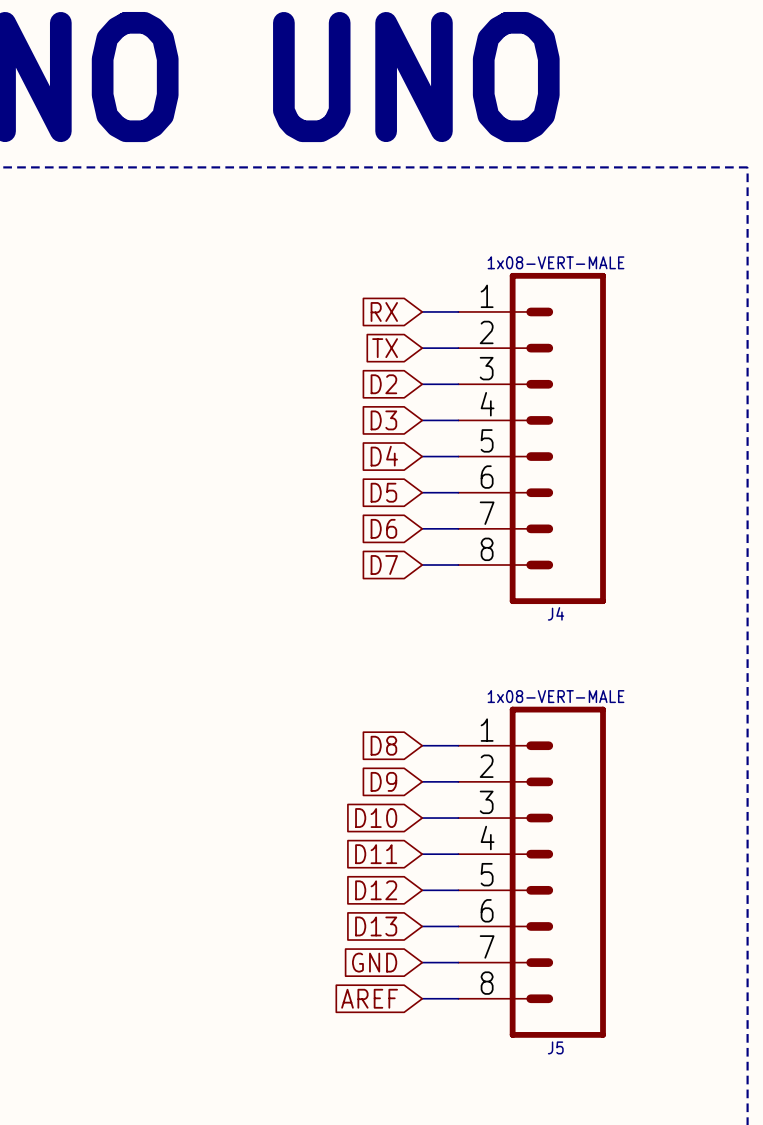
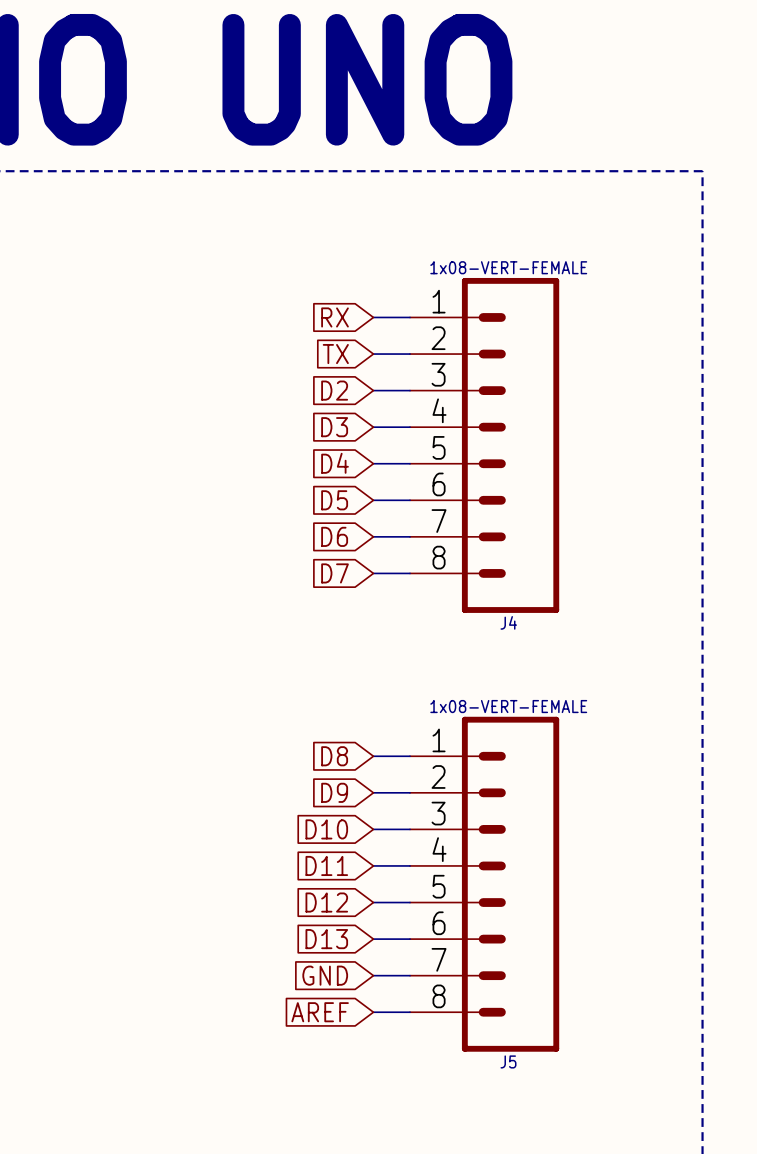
J4 value: 1x08-VERT-MALE (556, 262) -> 1x08-VERT-FEMALE (508, 267)
J5 value: 1x08-VERT-MALE (556, 696) -> 1x08-VERT-FEMALE (508, 706)

